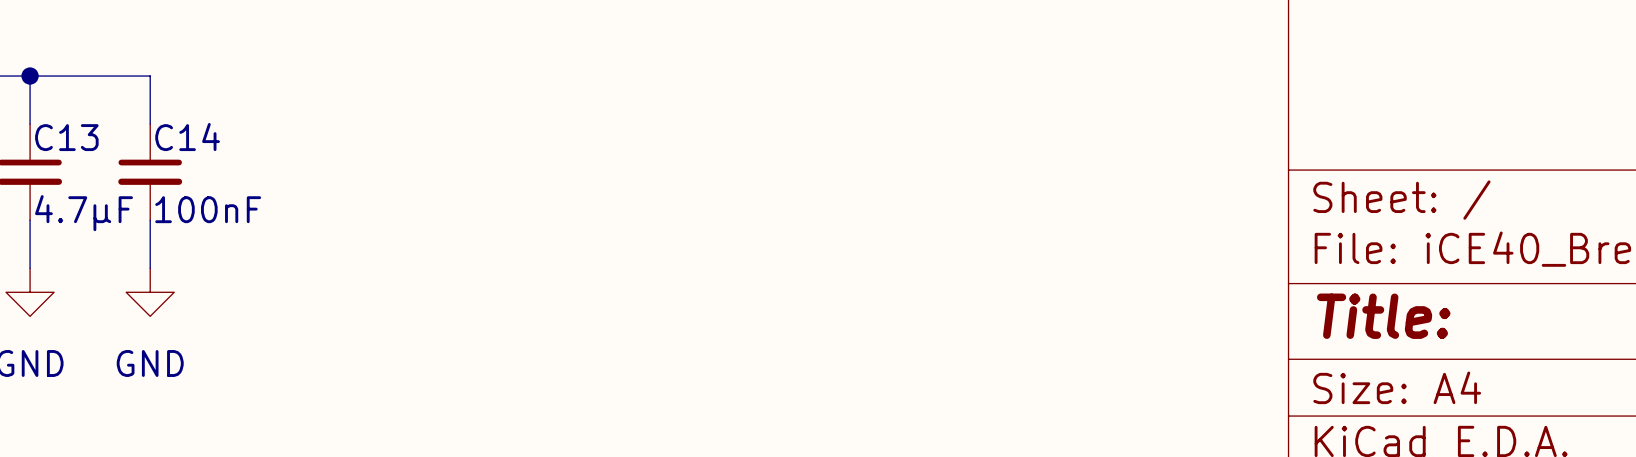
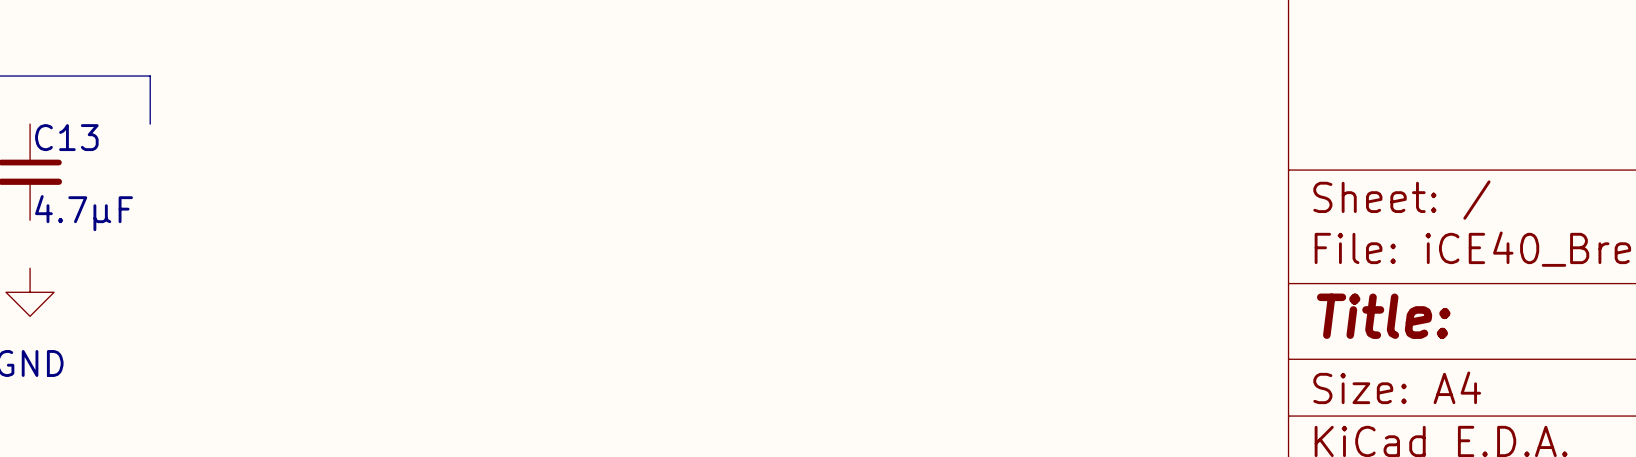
wire: (30, 76) (30, 124) -> none
junction: (30, 76) -> none
C14: 100nF (150, 172) -> none
wire: (30, 220) (30, 268) -> none
wire: (150, 220) (150, 268) -> none
power symbol: GND (150, 292) -> none

